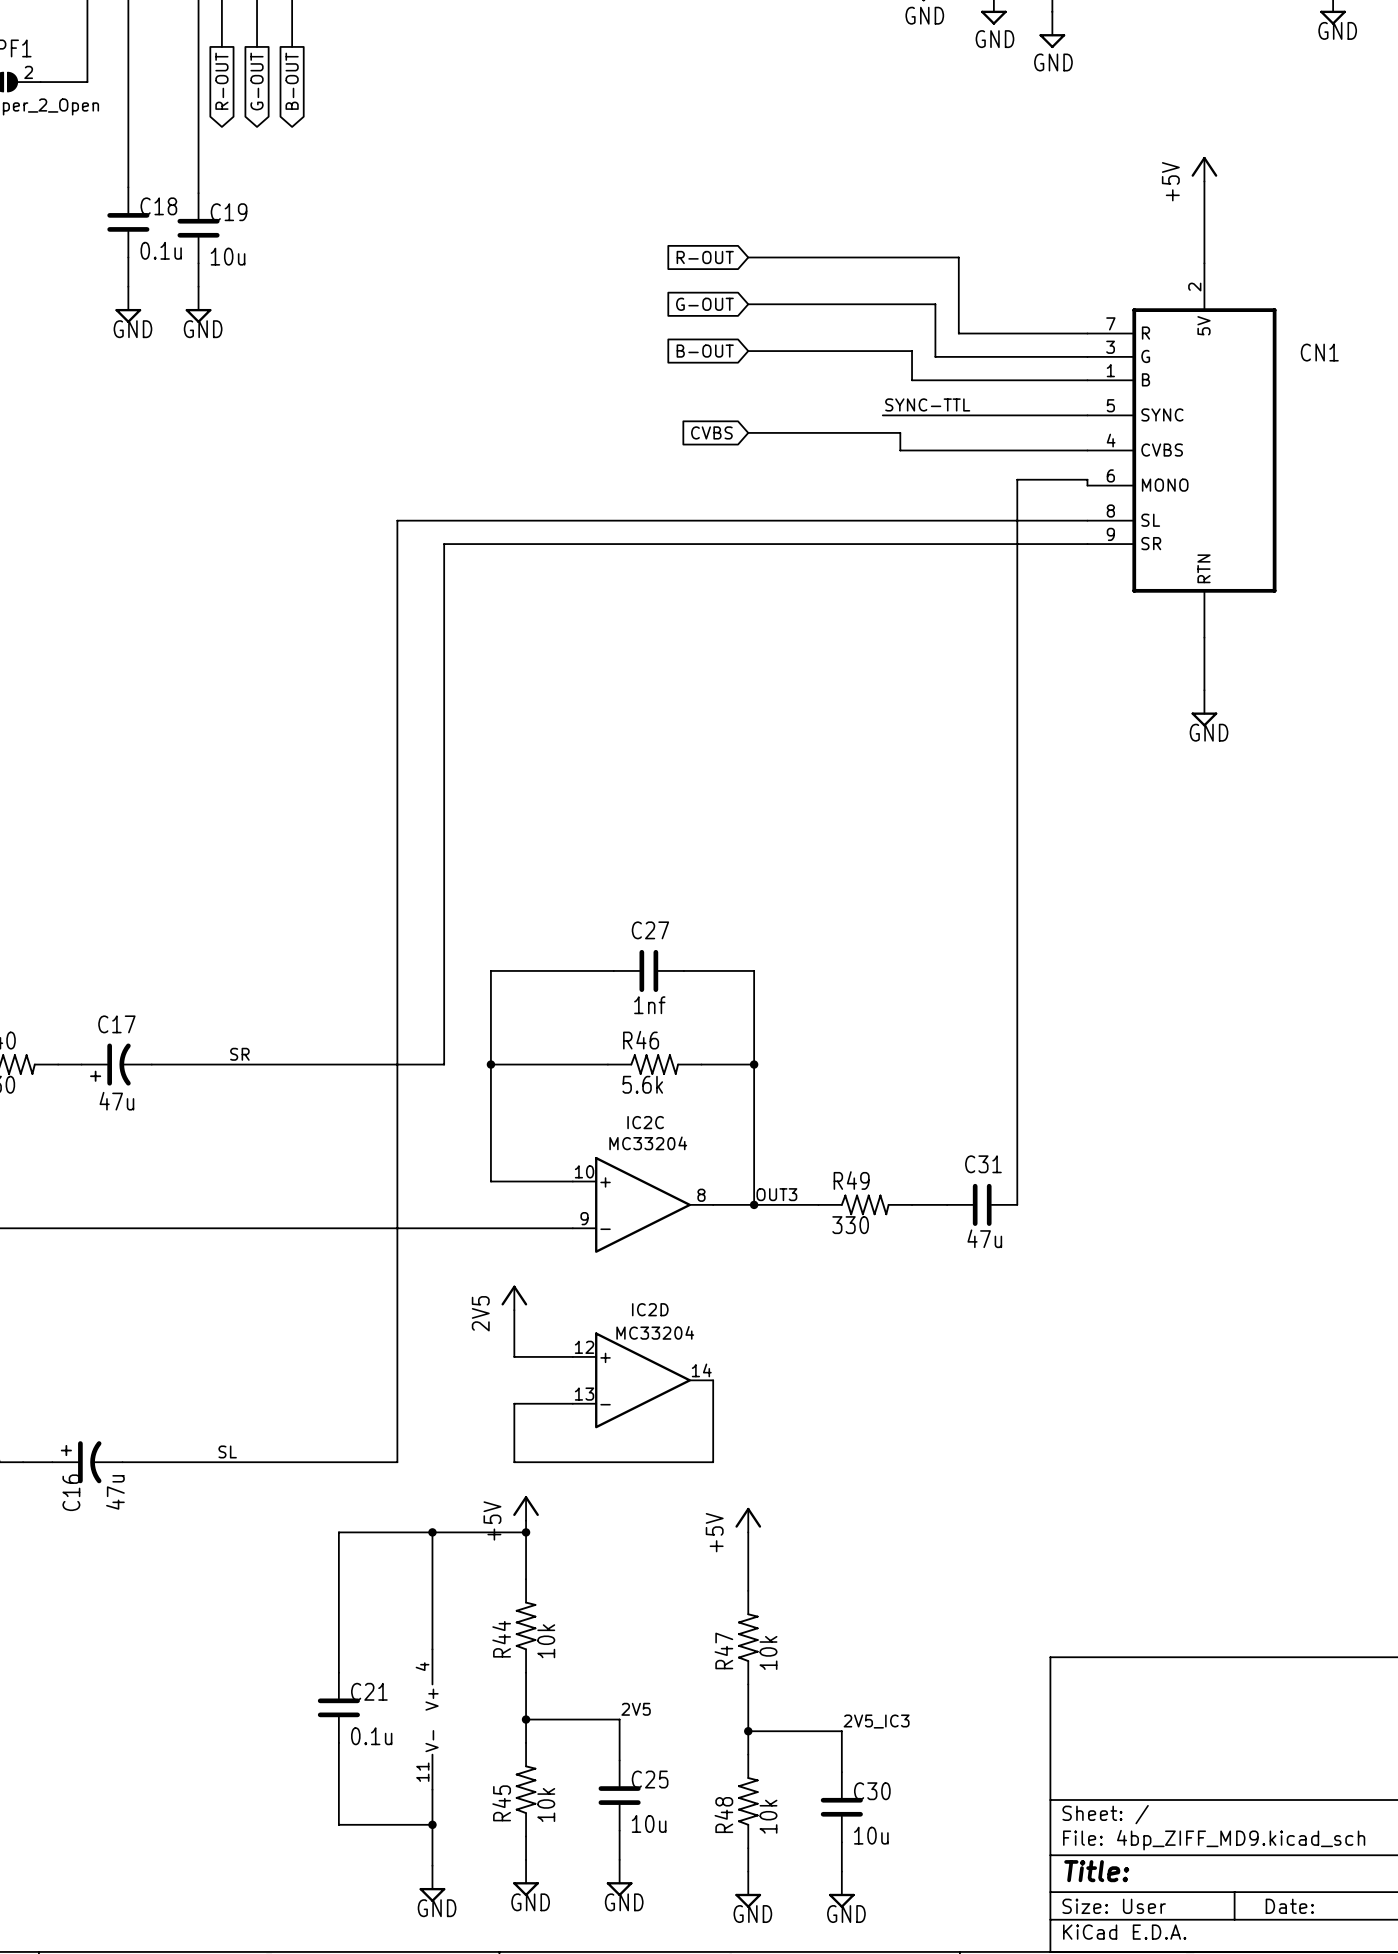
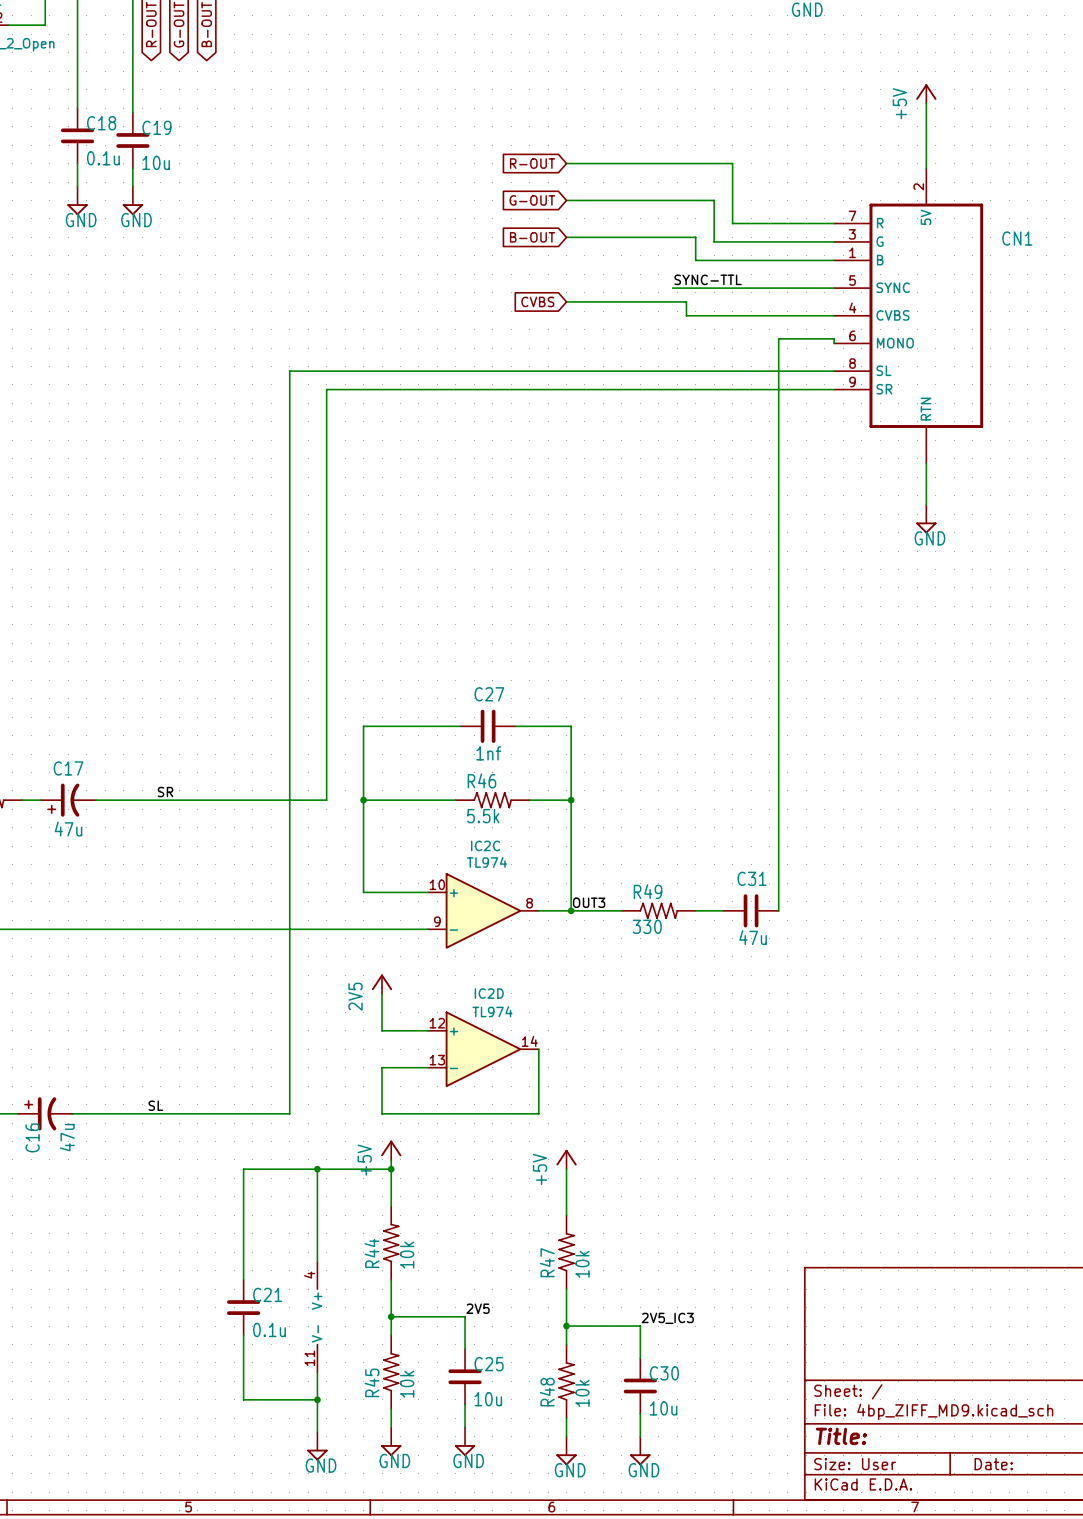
R46 value: 5.6k (642, 1084) -> 5.5k (483, 816)
IC2C value: MC33204 (648, 1143) -> TL974 (486, 862)
IC2D value: MC33204 (655, 1332) -> TL974 (492, 1011)

